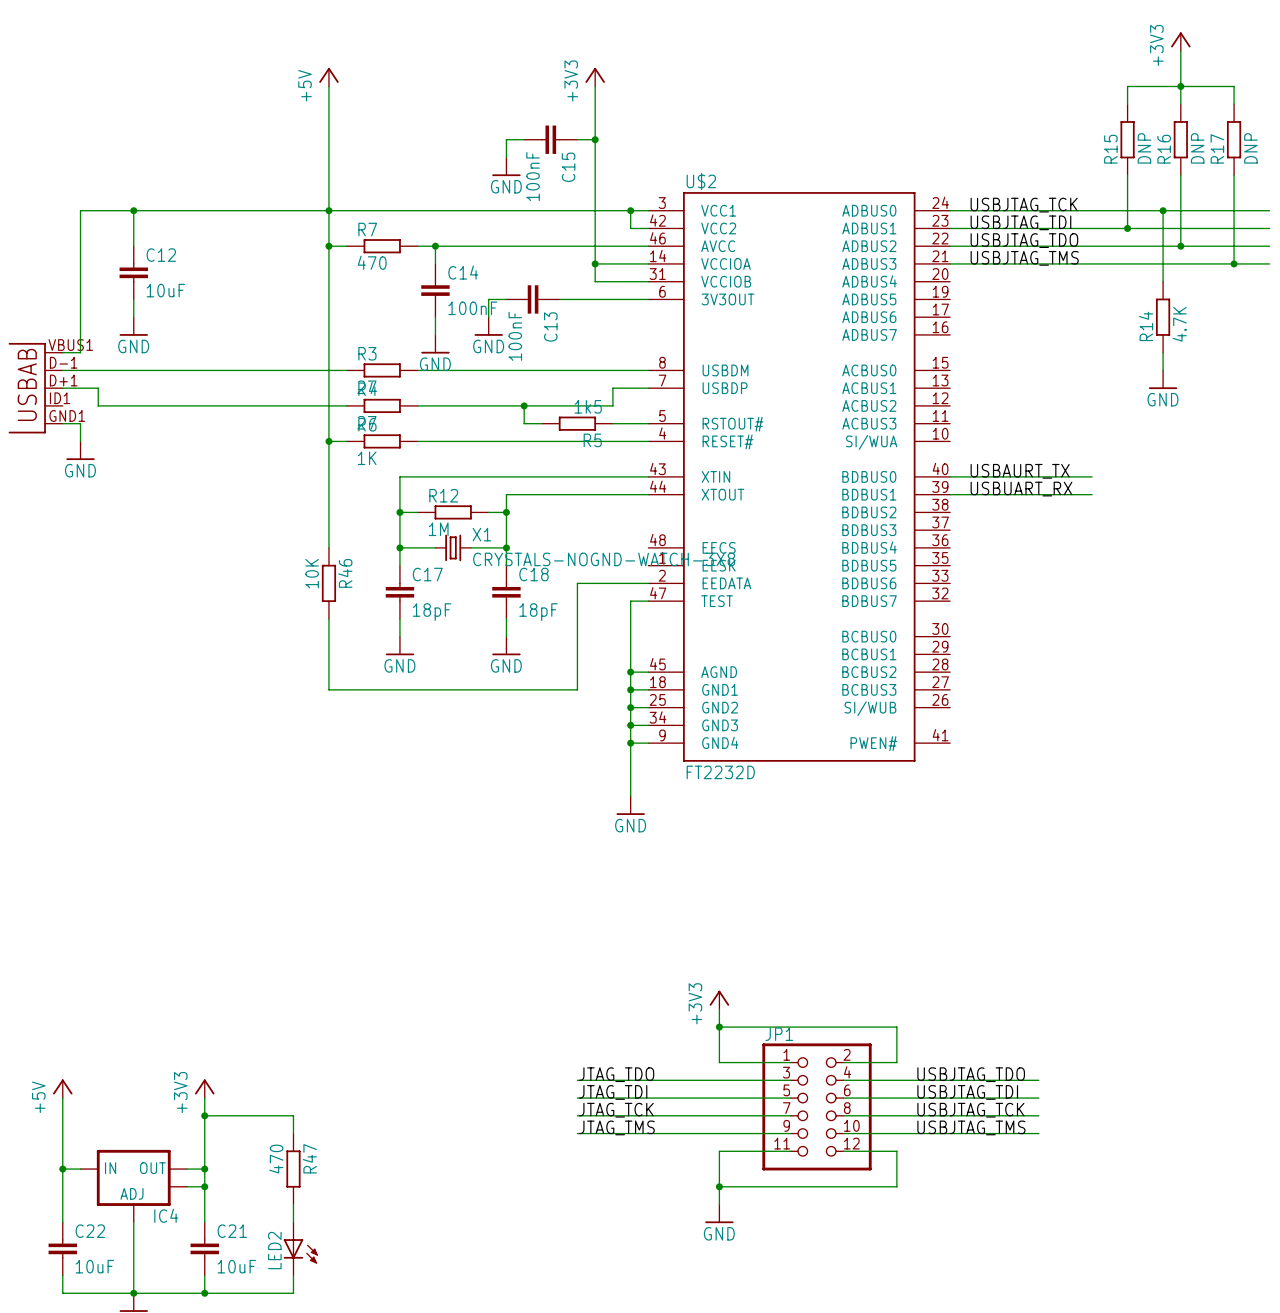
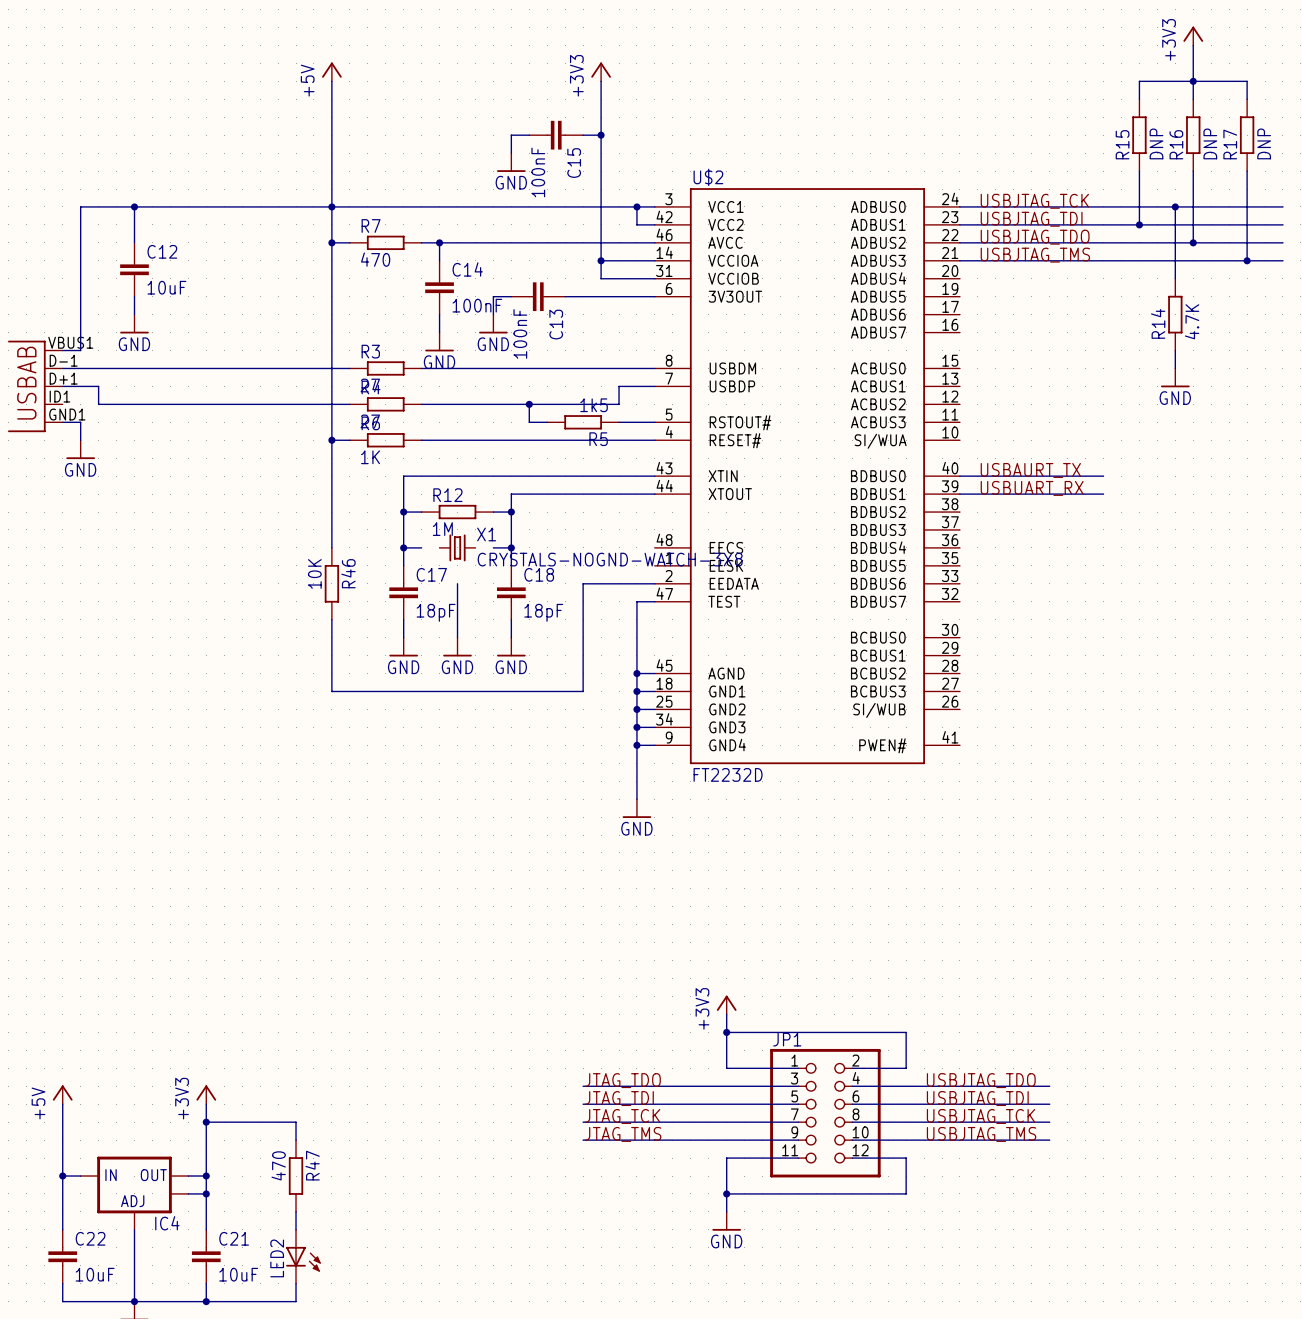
wire: (417, 547) (435, 547) -> none
wire: (470, 547) (488, 547) -> none
wire: none -> (457, 583) (457, 637)
power symbol: none -> GND (457, 647)

